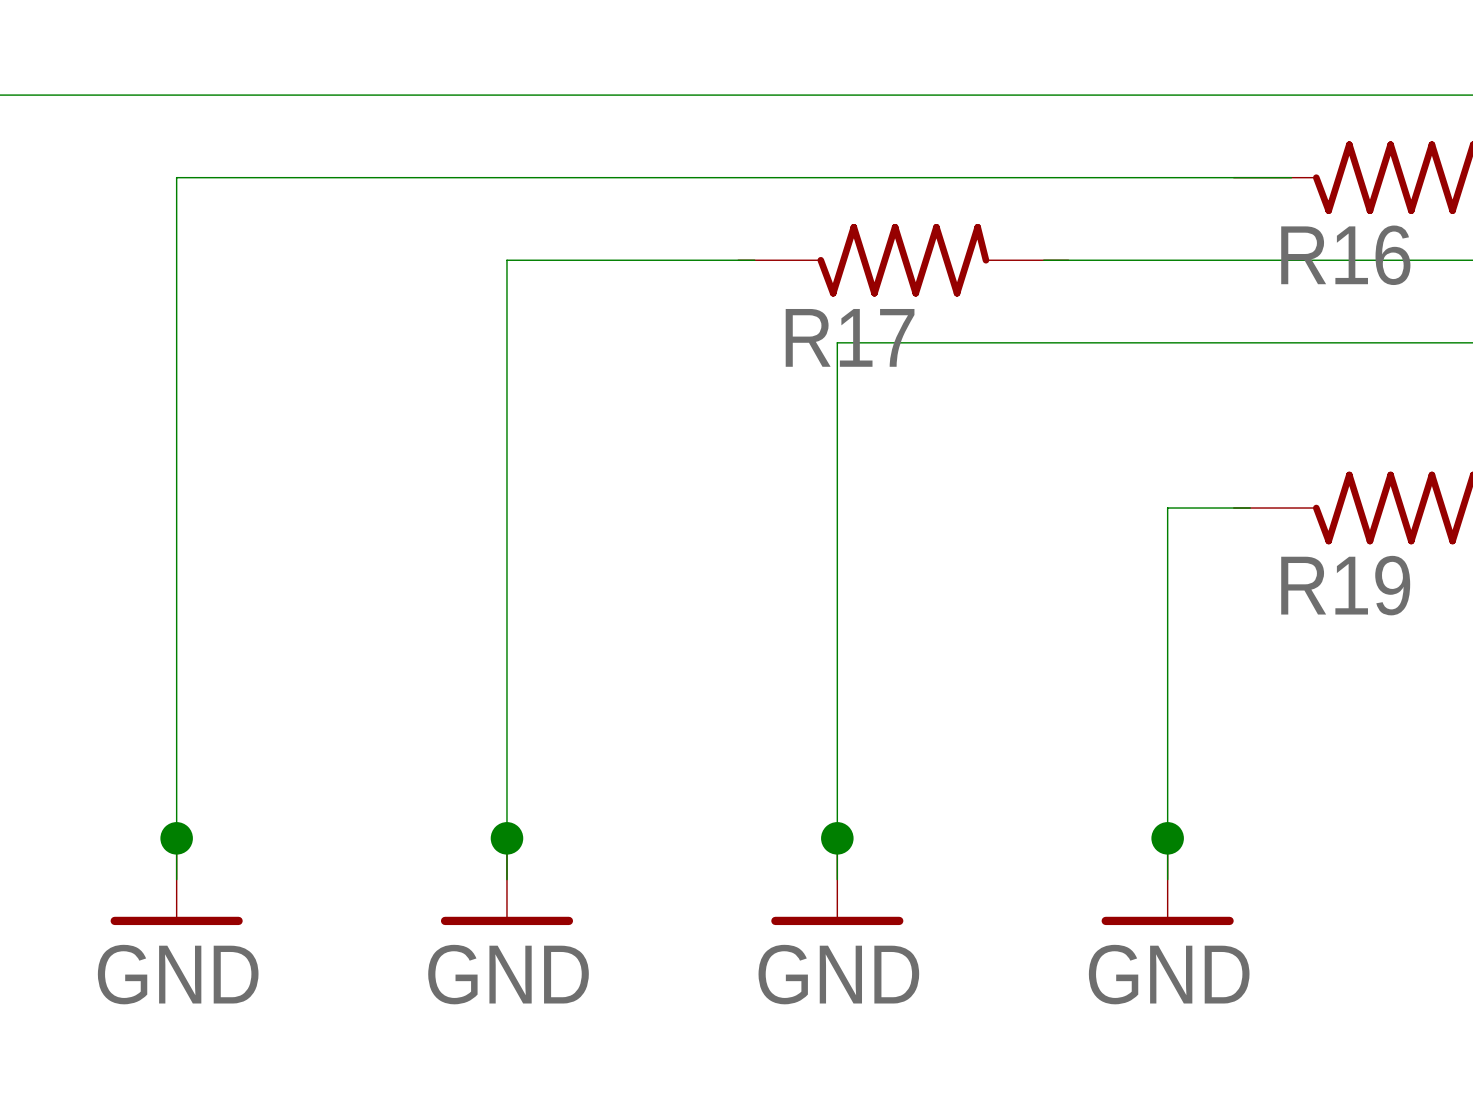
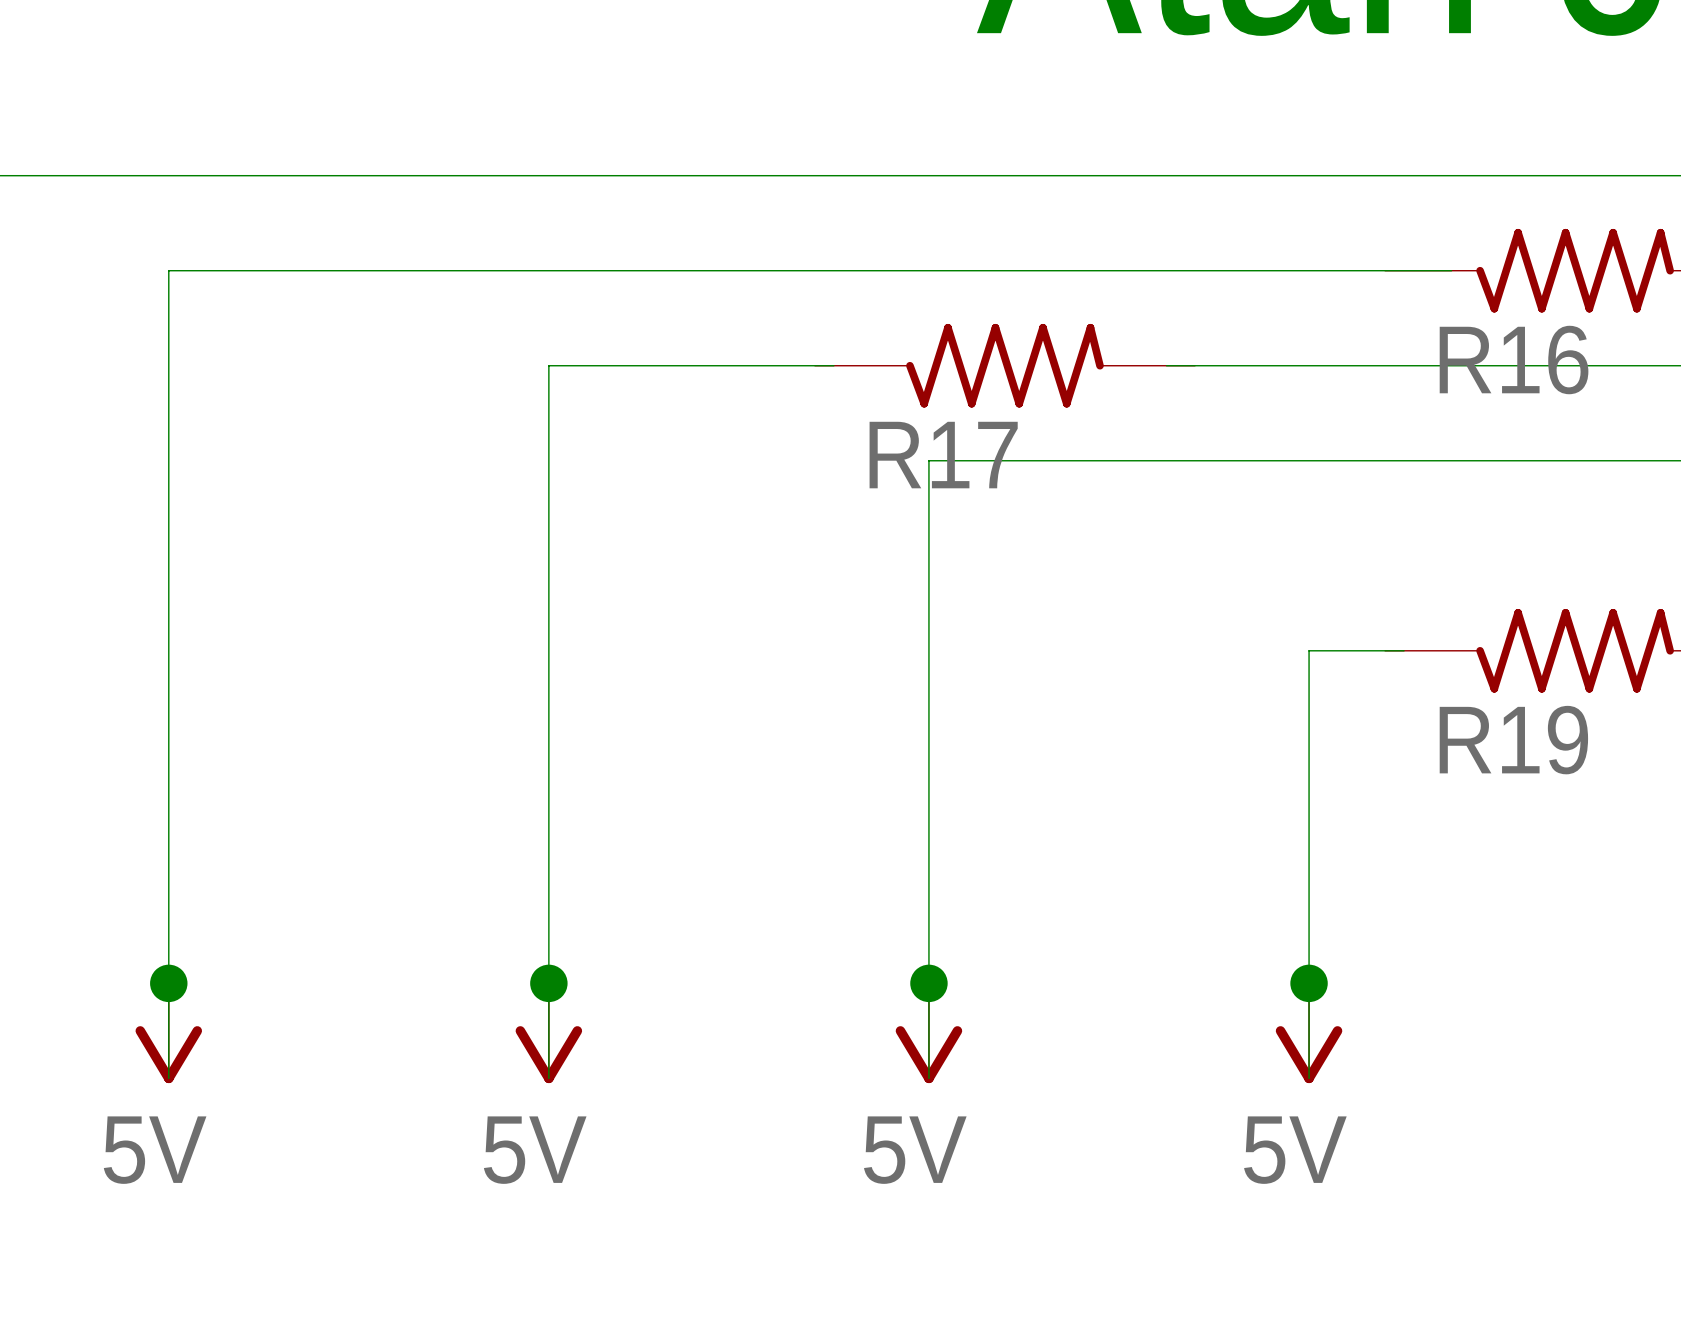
junction position: (176, 838) -> (168, 983)
junction position: (506, 838) -> (548, 983)
junction position: (837, 838) -> (928, 983)
junction position: (1167, 838) -> (1309, 983)
power symbol: none -> 5V (168, 1033)
power symbol: none -> 5V (548, 1033)
power symbol: none -> 5V (928, 1033)
power symbol: none -> 5V (1309, 1033)
power symbol: GND (176, 881) -> none
power symbol: GND (506, 881) -> none
power symbol: GND (837, 881) -> none
power symbol: GND (1167, 881) -> none

